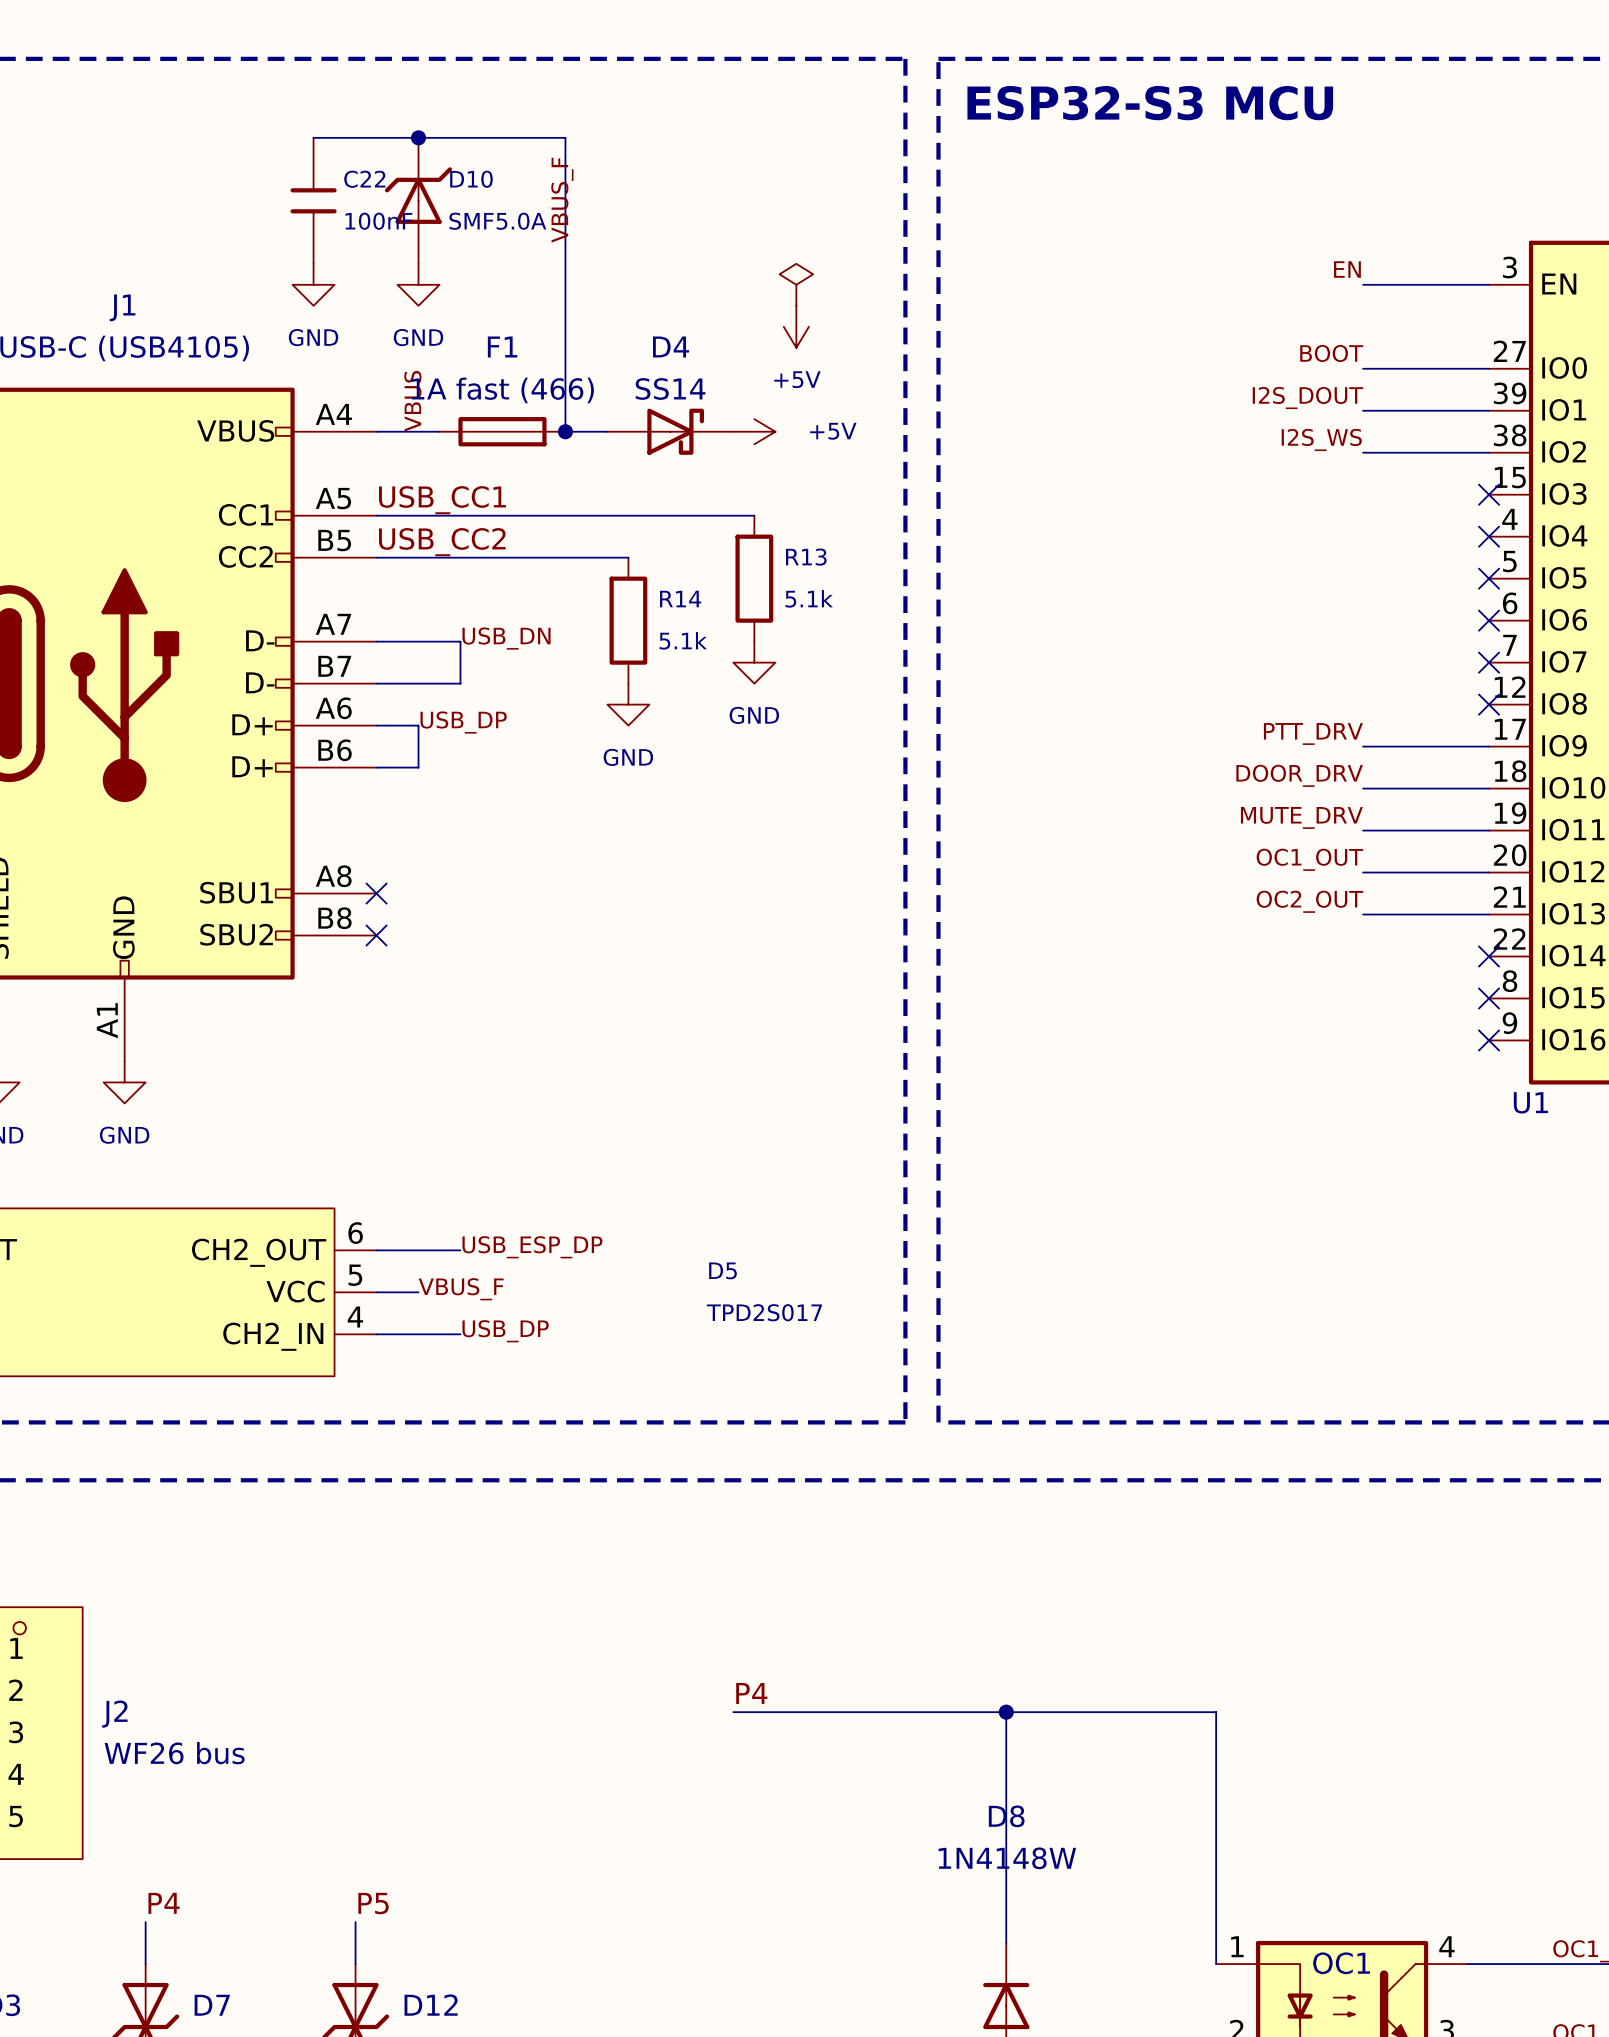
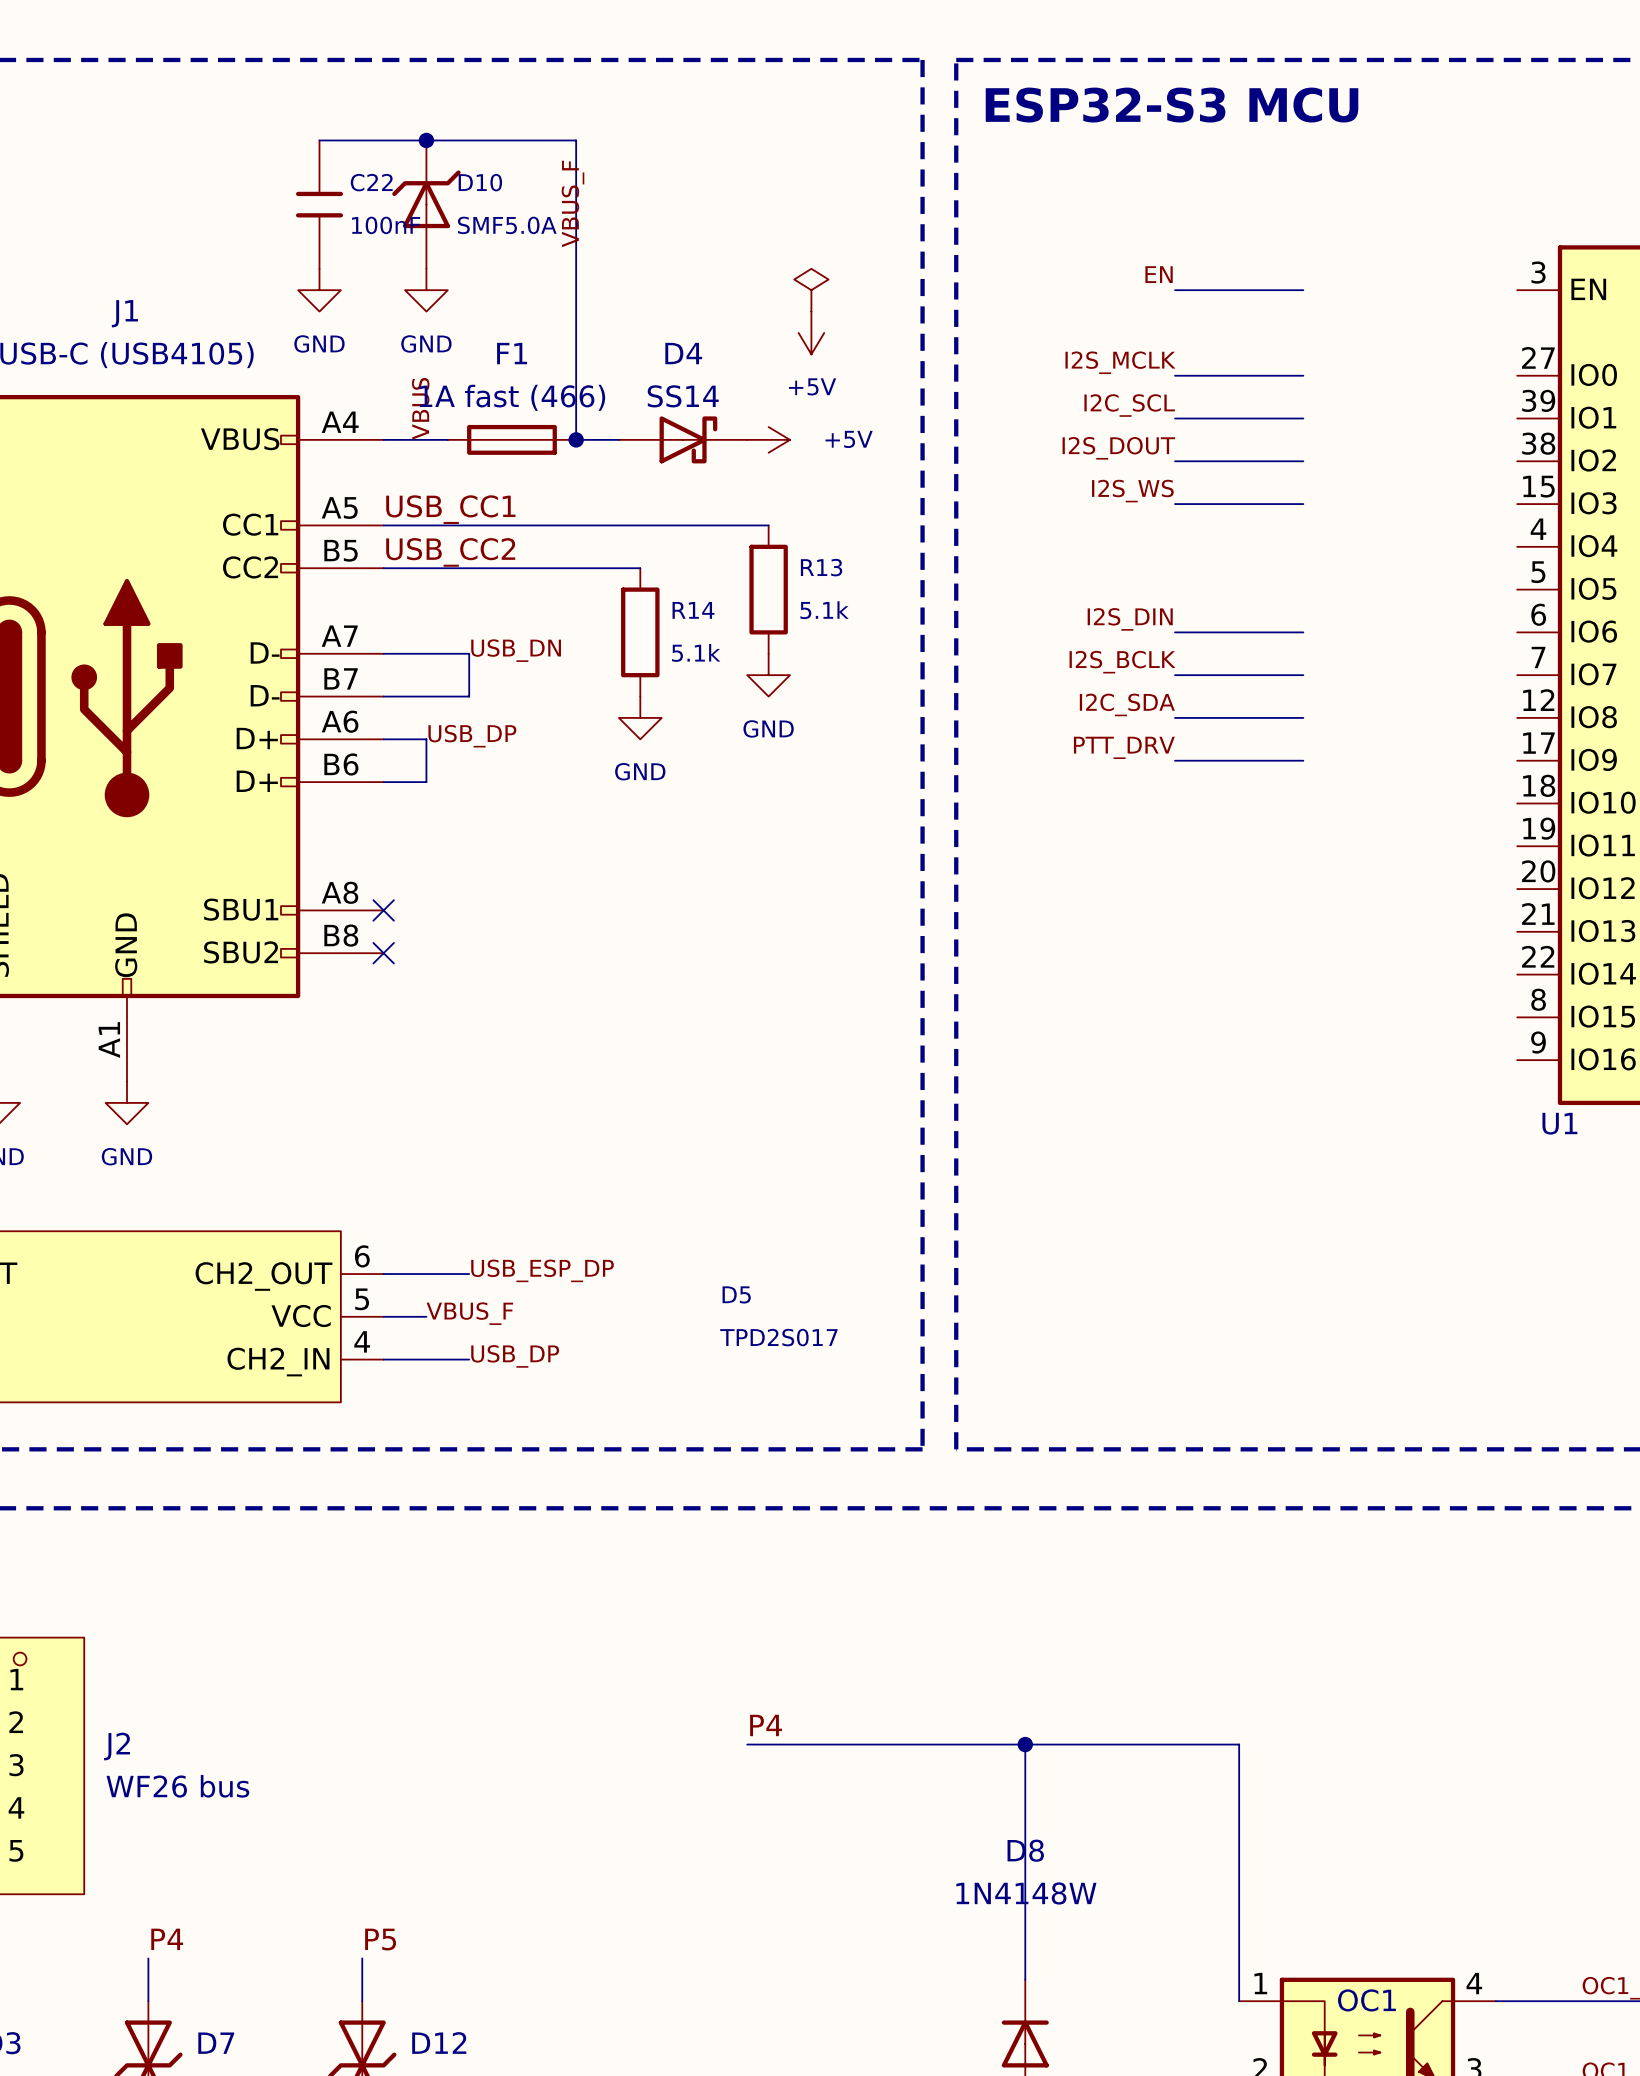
label position: EN (1347, 269) -> EN (1159, 274)
wire: (1363, 284) (1489, 284) -> (1175, 290) (1303, 290)
label: BOOT (1331, 353) -> none
label: none -> I2S_MCLK (1120, 362)
wire: (1363, 368) (1489, 368) -> (1175, 375) (1303, 375)
label: none -> I2C_SCL (1129, 405)
label position: I2S_DOUT (1307, 397) -> I2S_DOUT (1118, 448)
wire: (1363, 410) (1489, 410) -> (1175, 418) (1303, 418)
label position: I2S_WS (1321, 439) -> I2S_WS (1132, 491)
wire: (1363, 452) (1489, 452) -> (1175, 461) (1303, 461)
wire: none -> (1175, 504) (1303, 504)
no-connect mark: (1489, 494) -> none
no-connect mark: (1489, 536) -> none
no-connect mark: (1489, 578) -> none
label: none -> I2S_DIN (1130, 619)
no-connect mark: (1489, 620) -> none
label: none -> I2S_BCLK (1122, 662)
no-connect mark: (1489, 662) -> none
label: none -> I2C_SDA (1127, 704)
no-connect mark: (1489, 704) -> none
label position: PTT_DRV (1313, 733) -> PTT_DRV (1124, 747)
wire: (1363, 746) (1489, 746) -> (1175, 760) (1303, 760)
label: DOOR_DRV (1299, 775) -> none
wire: (1363, 788) (1489, 788) -> (1175, 717) (1303, 717)
label: MUTE_DRV (1301, 817) -> none
wire: (1363, 830) (1489, 830) -> (1175, 675) (1303, 675)
label: OC1_OUT (1309, 859) -> none
wire: (1363, 872) (1489, 872) -> (1175, 632) (1303, 632)
label: OC2_OUT (1309, 901) -> none
wire: (1363, 914) (1489, 914) -> none
no-connect mark: (1489, 956) -> none
no-connect mark: (1489, 998) -> none
no-connect mark: (1489, 1040) -> none

